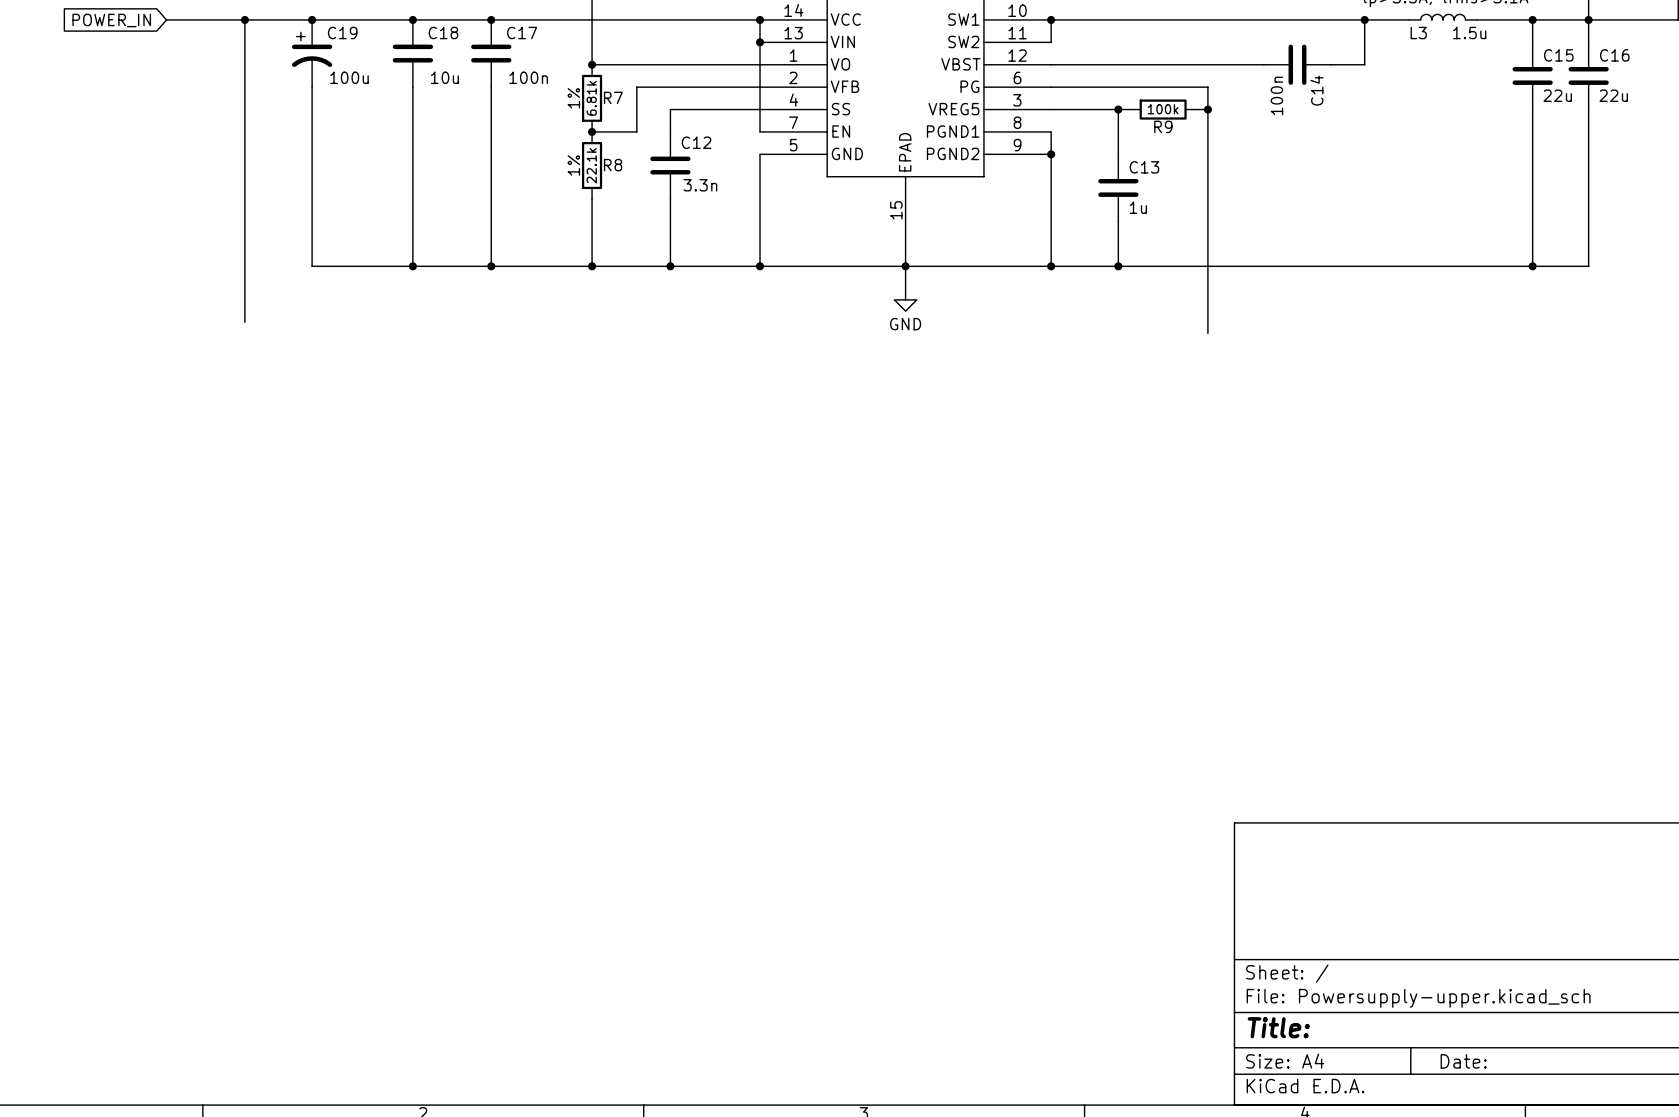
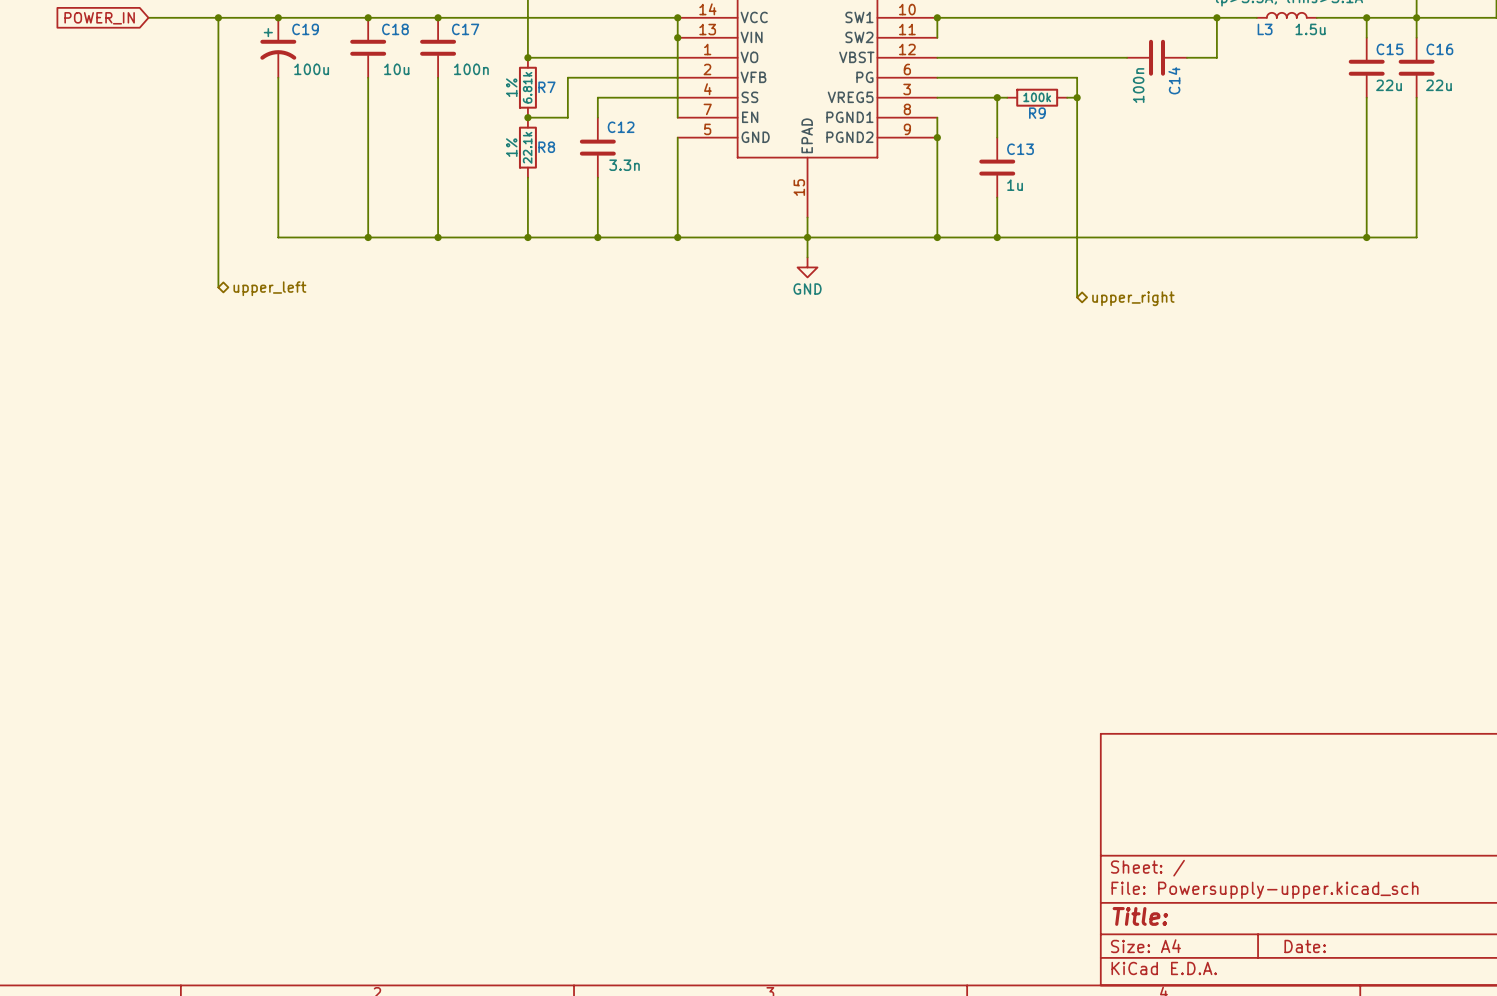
hierarchical label: none -> upper_left (269, 288)
hierarchical label: none -> upper_right (1133, 298)

